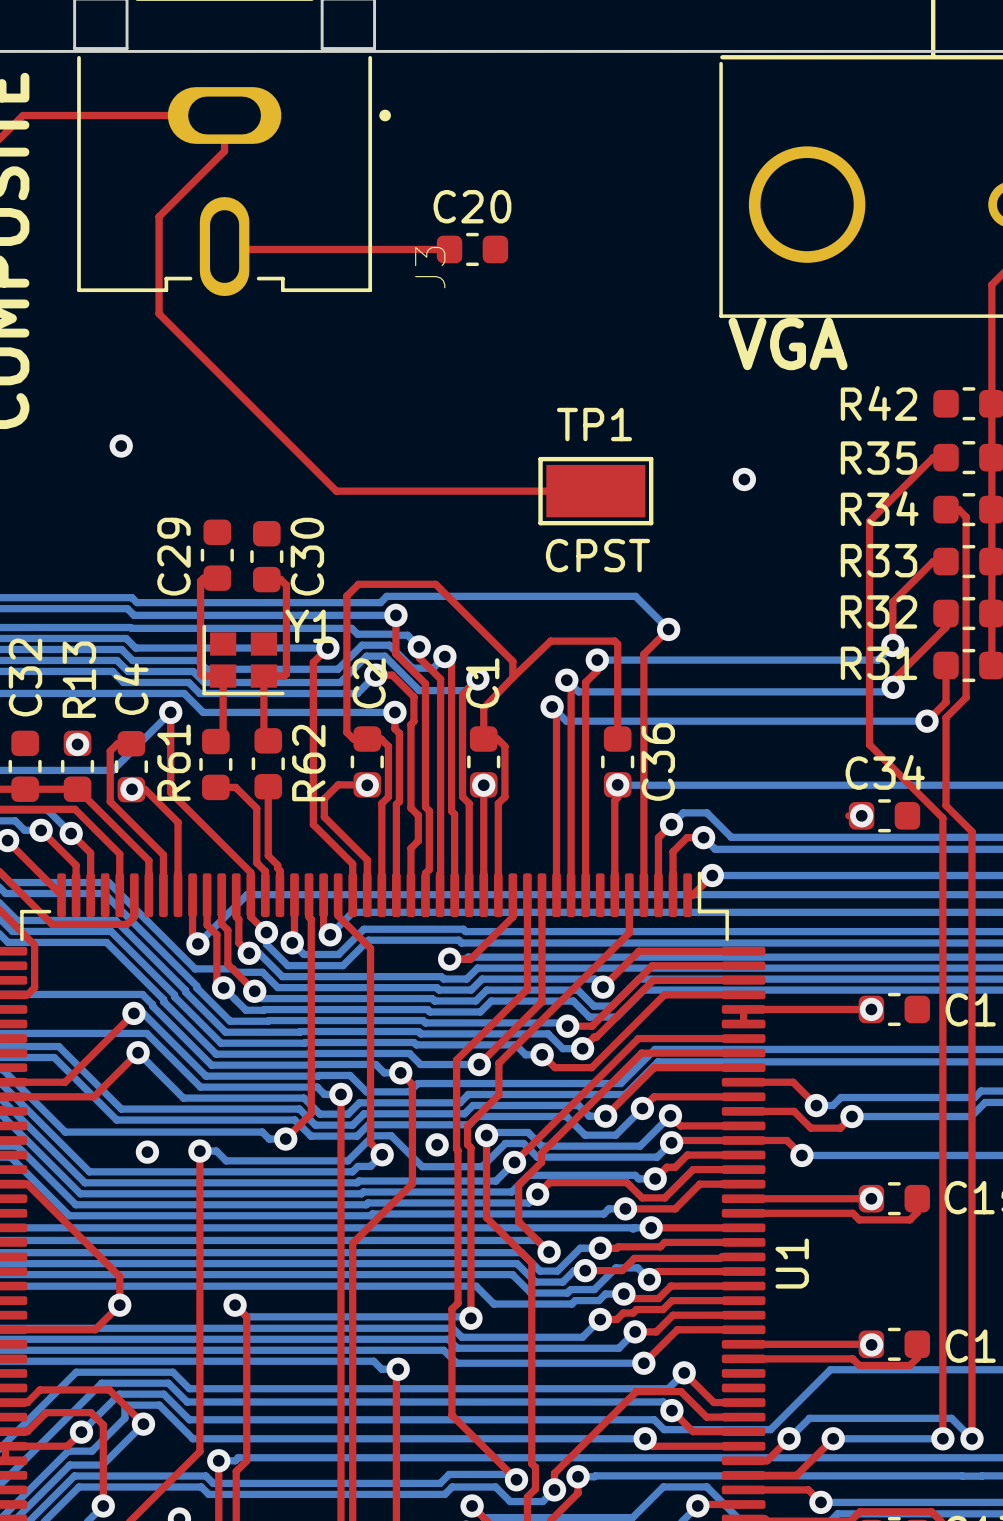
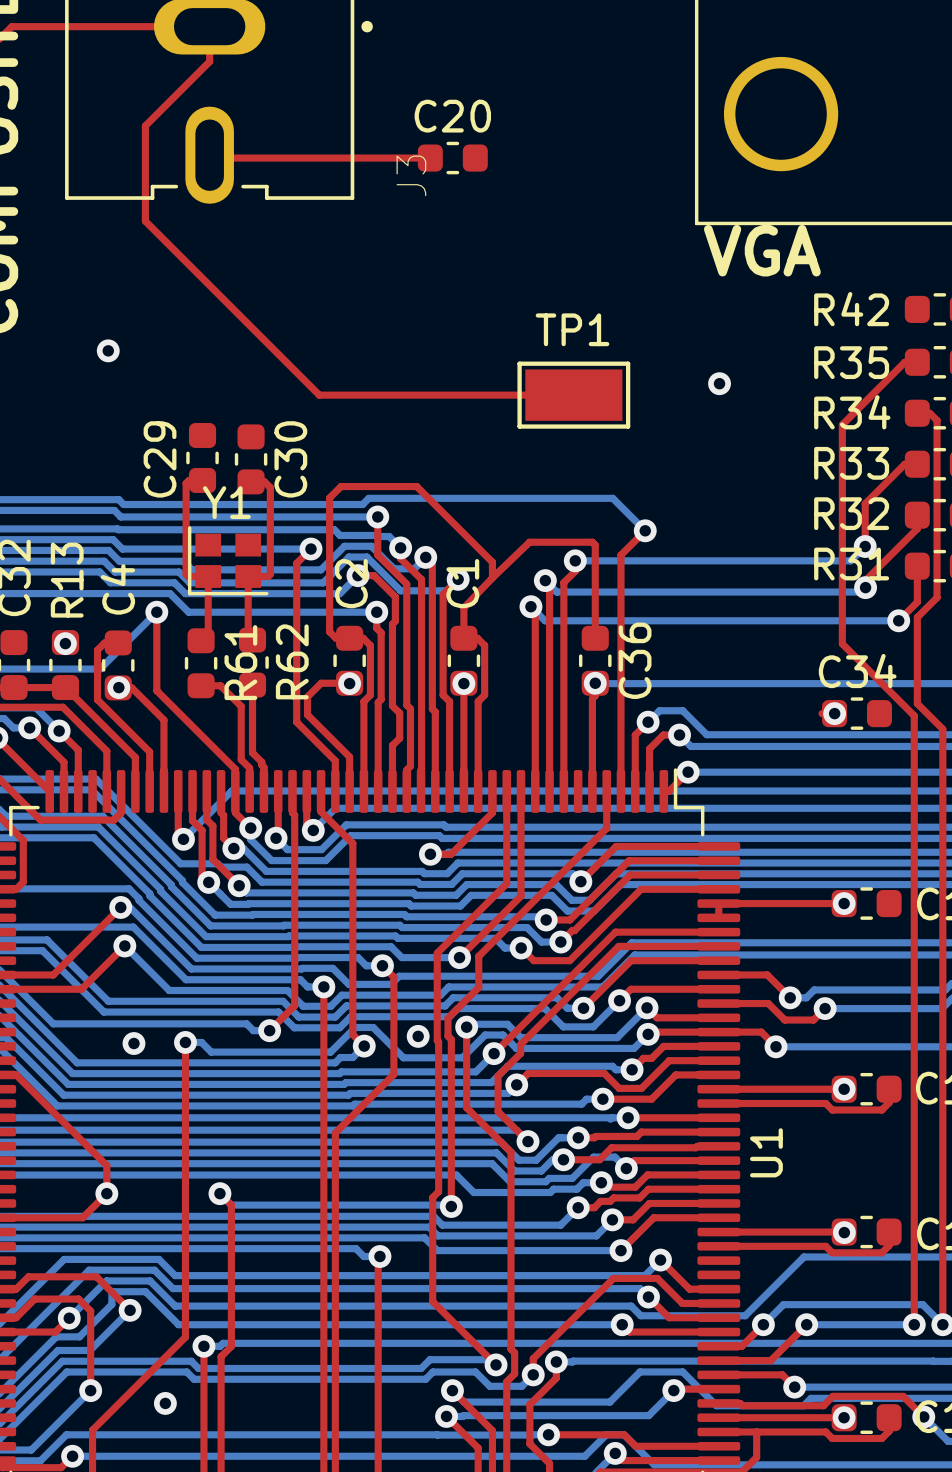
text: CPST (597, 555) -> none
Y1 name position: Y1 (309, 626) -> Y1 (226, 502)
R61 name position: R61 (174, 762) -> R61 (240, 662)

